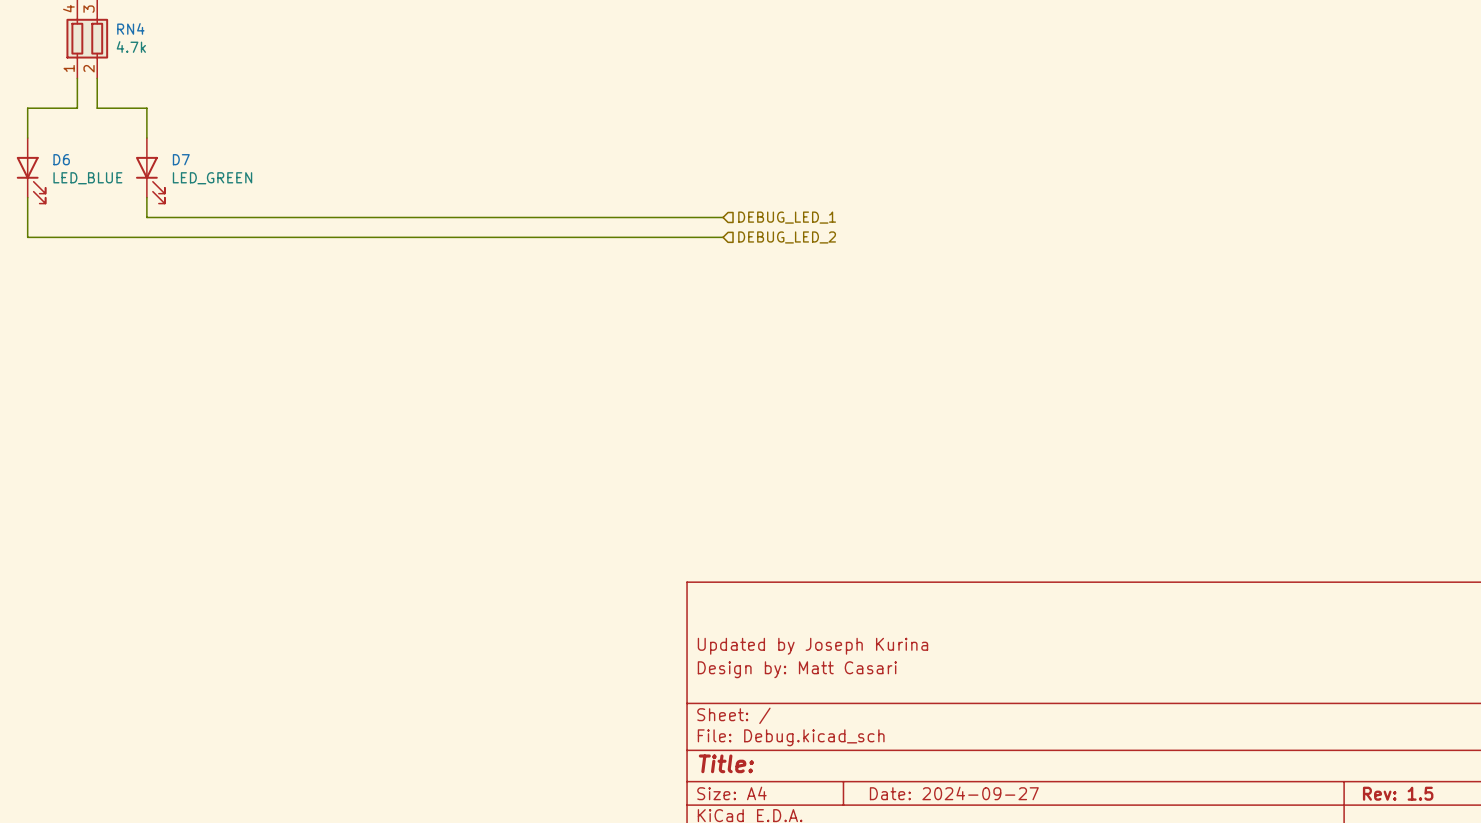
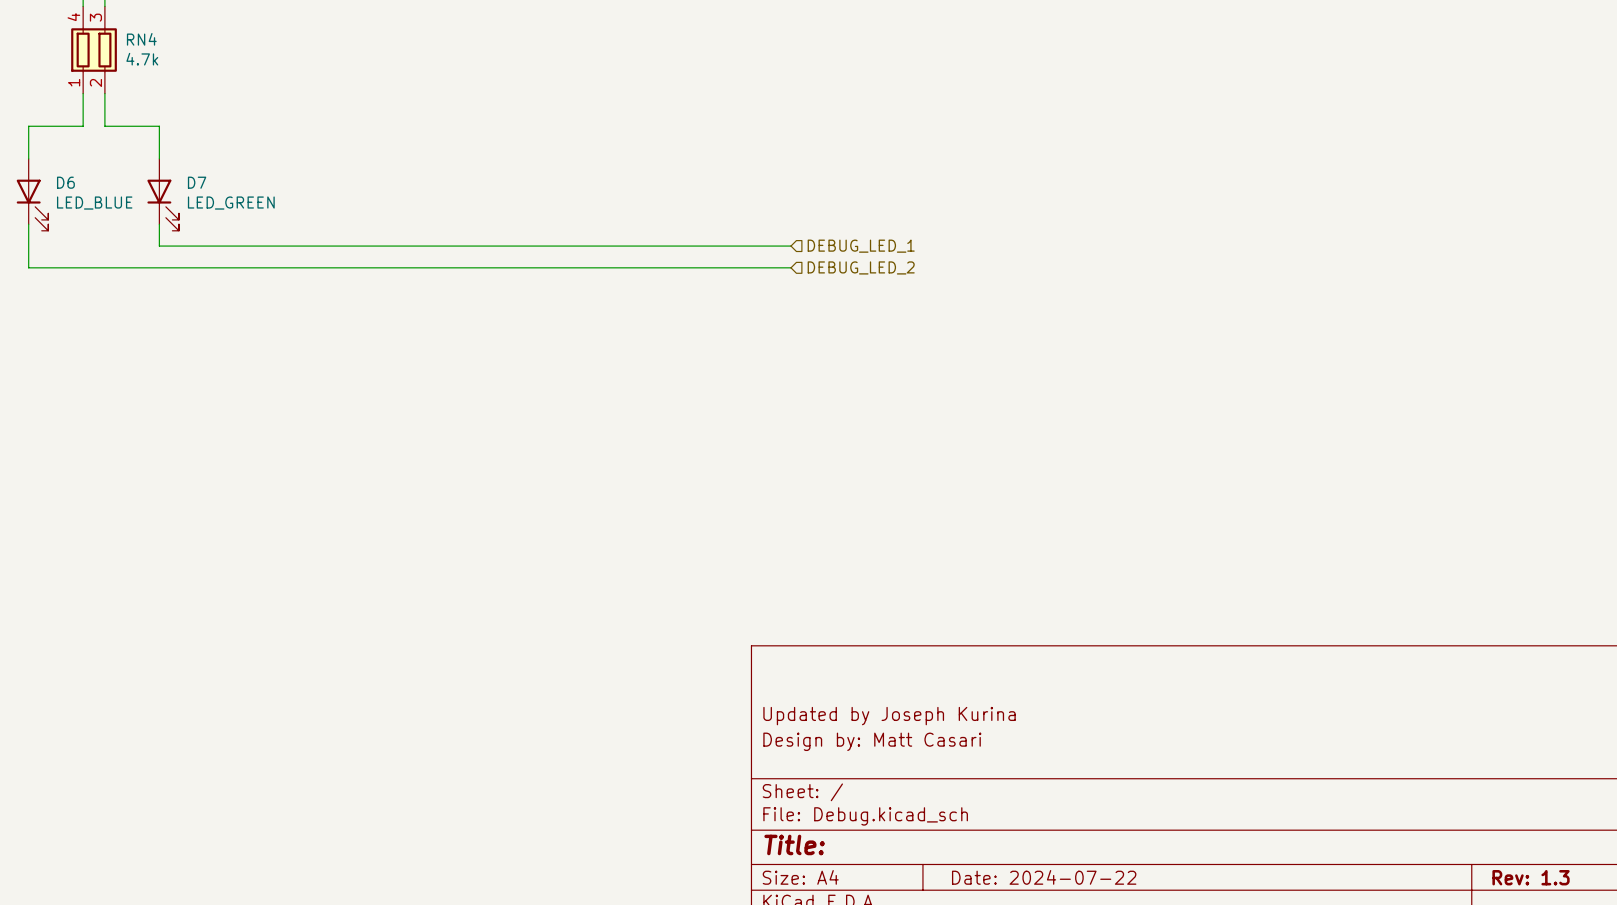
title block: Date: 2024-09-27 (954, 793) -> Date: 2024-07-22 (1044, 877)
title block: Rev: 1.5 (1398, 793) -> Rev: 1.3 (1531, 877)

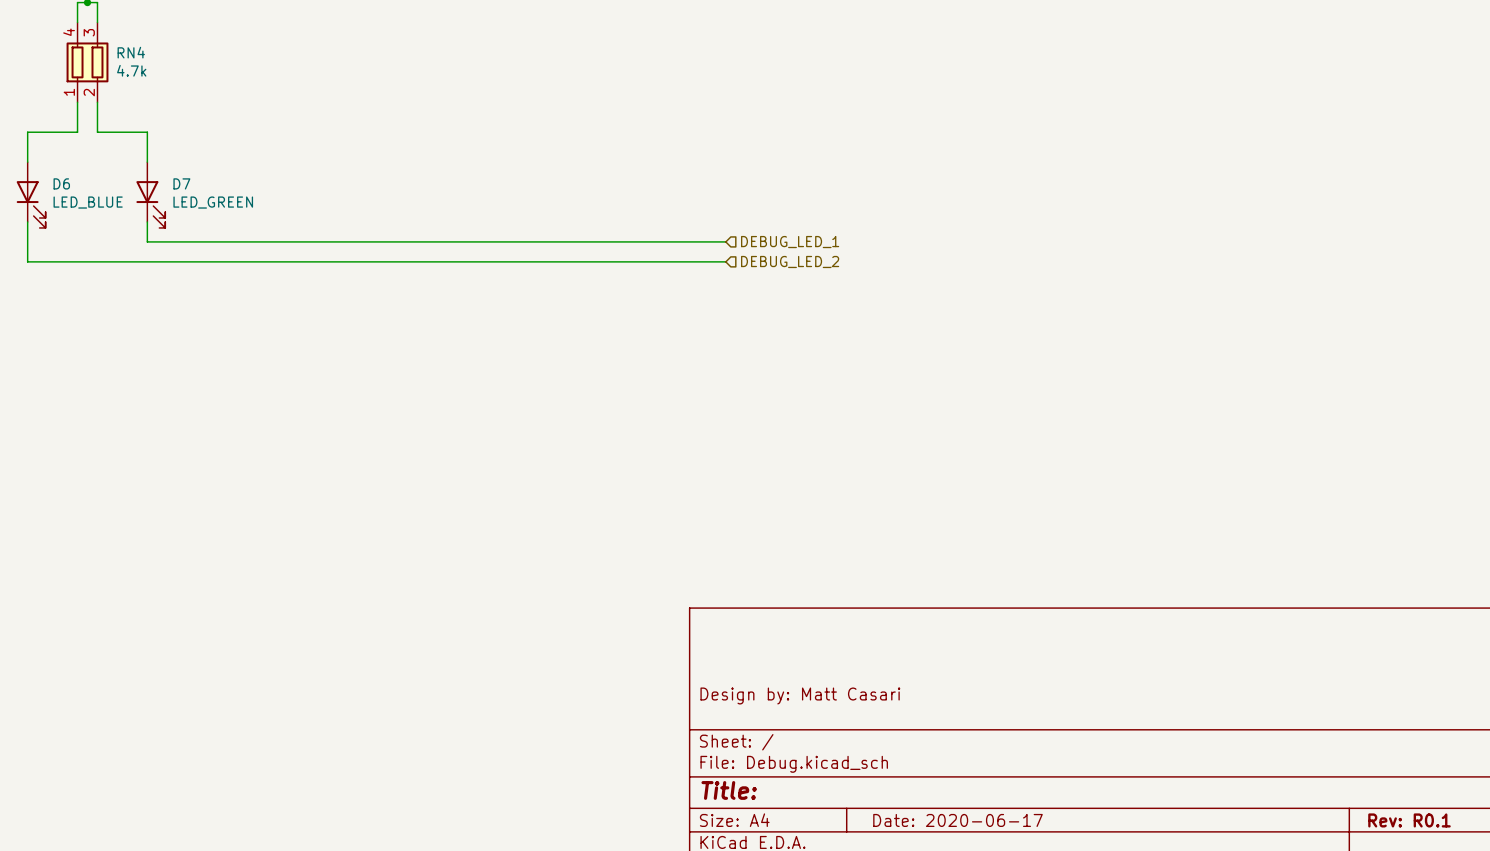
title block: Updated by Joseph Kurina (889, 716) -> none
title block: Date: 2024-07-22 (1044, 877) -> Date: 2020-06-17 (958, 820)
title block: Rev: 1.3 (1531, 877) -> Rev: R0.1 (1409, 820)

